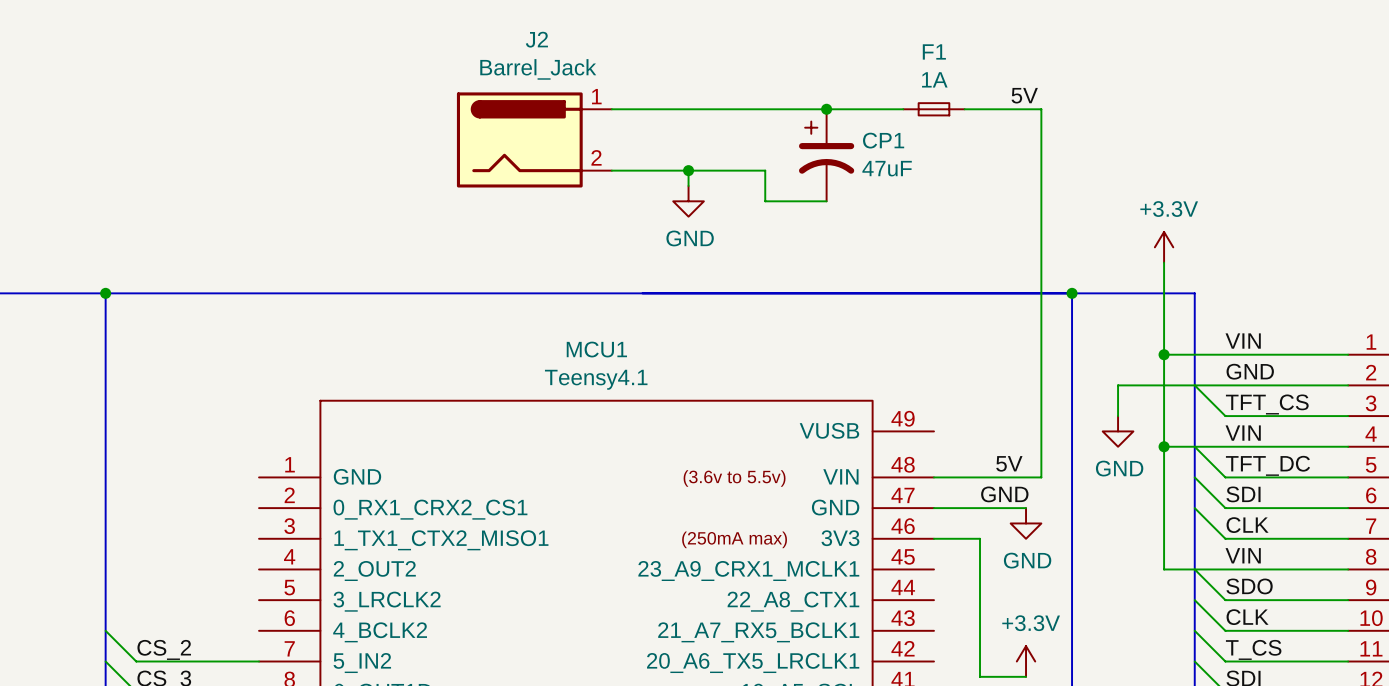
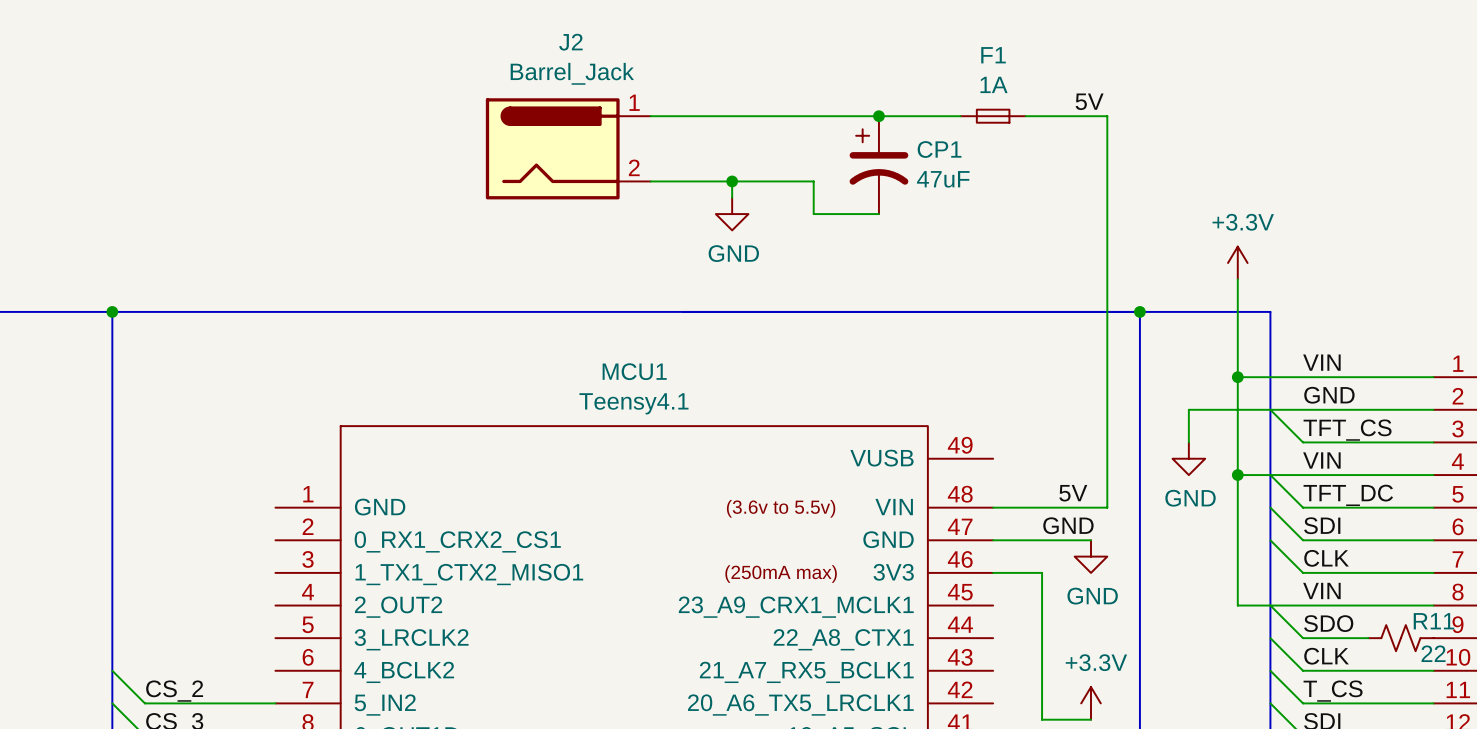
R11: none -> 22 (1400, 638)

